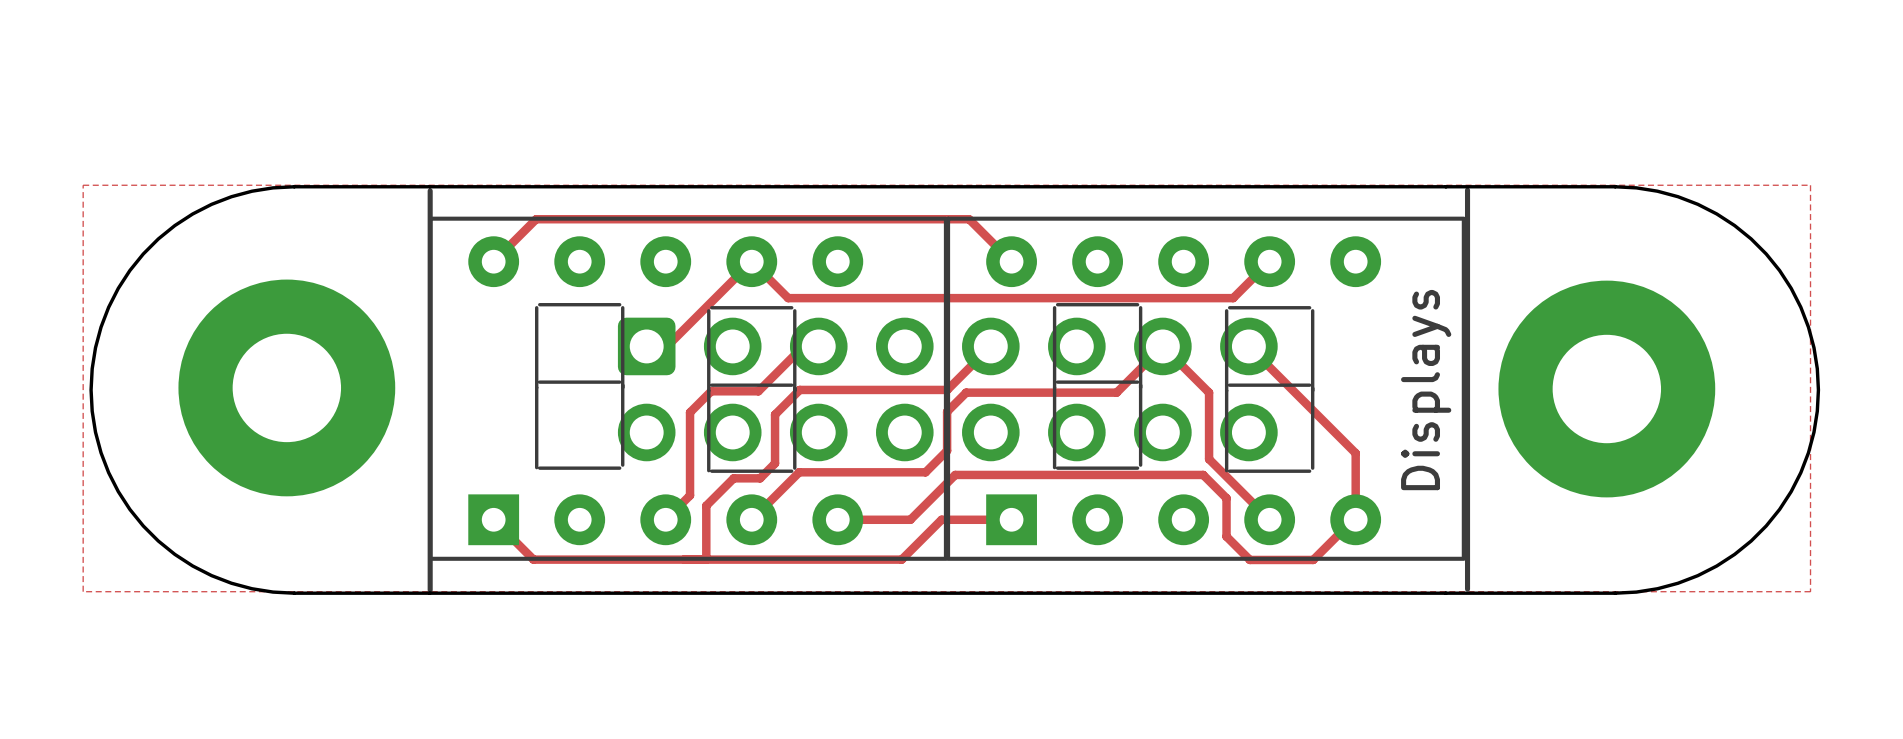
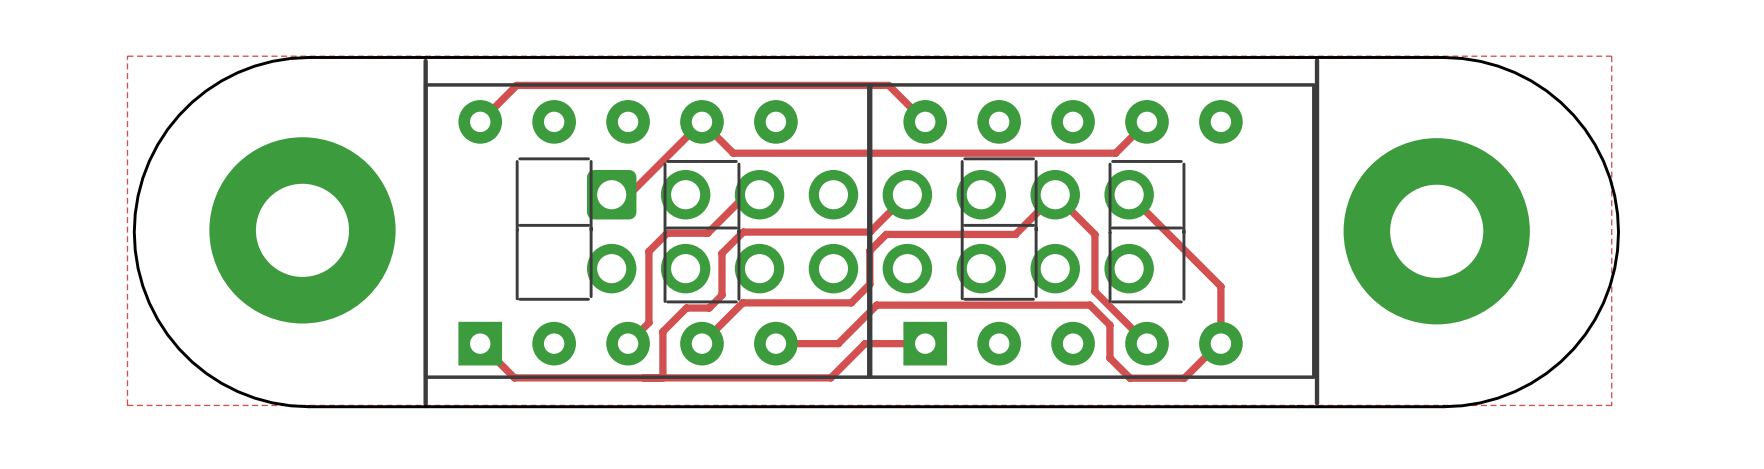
text: Displays (1426, 390) -> none

